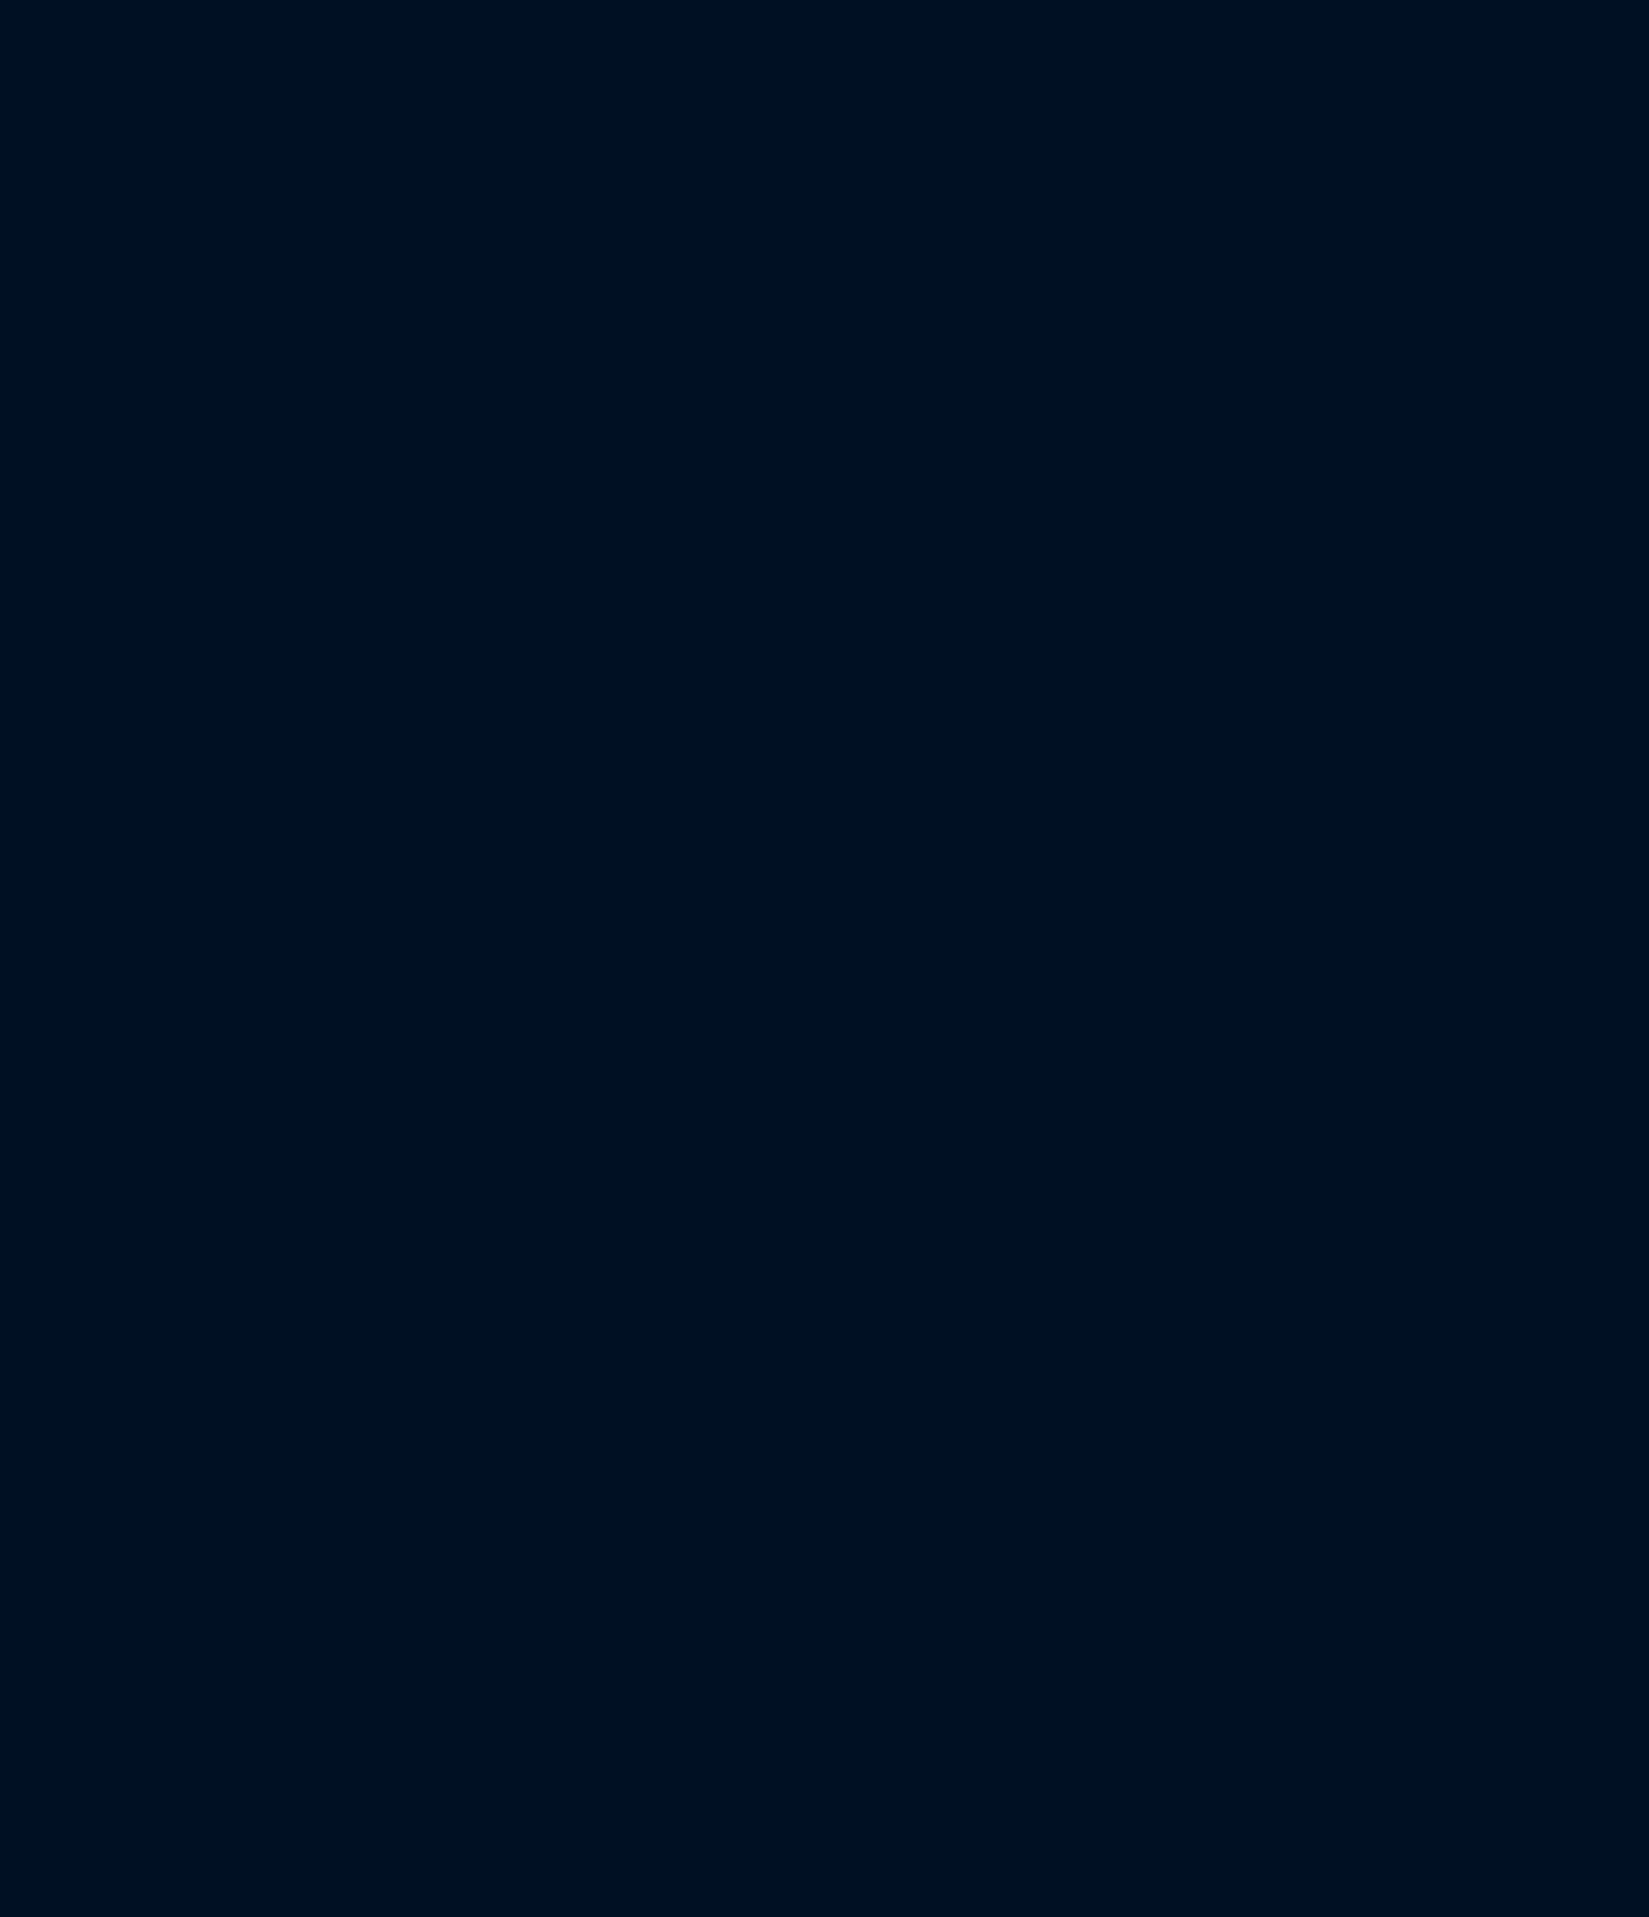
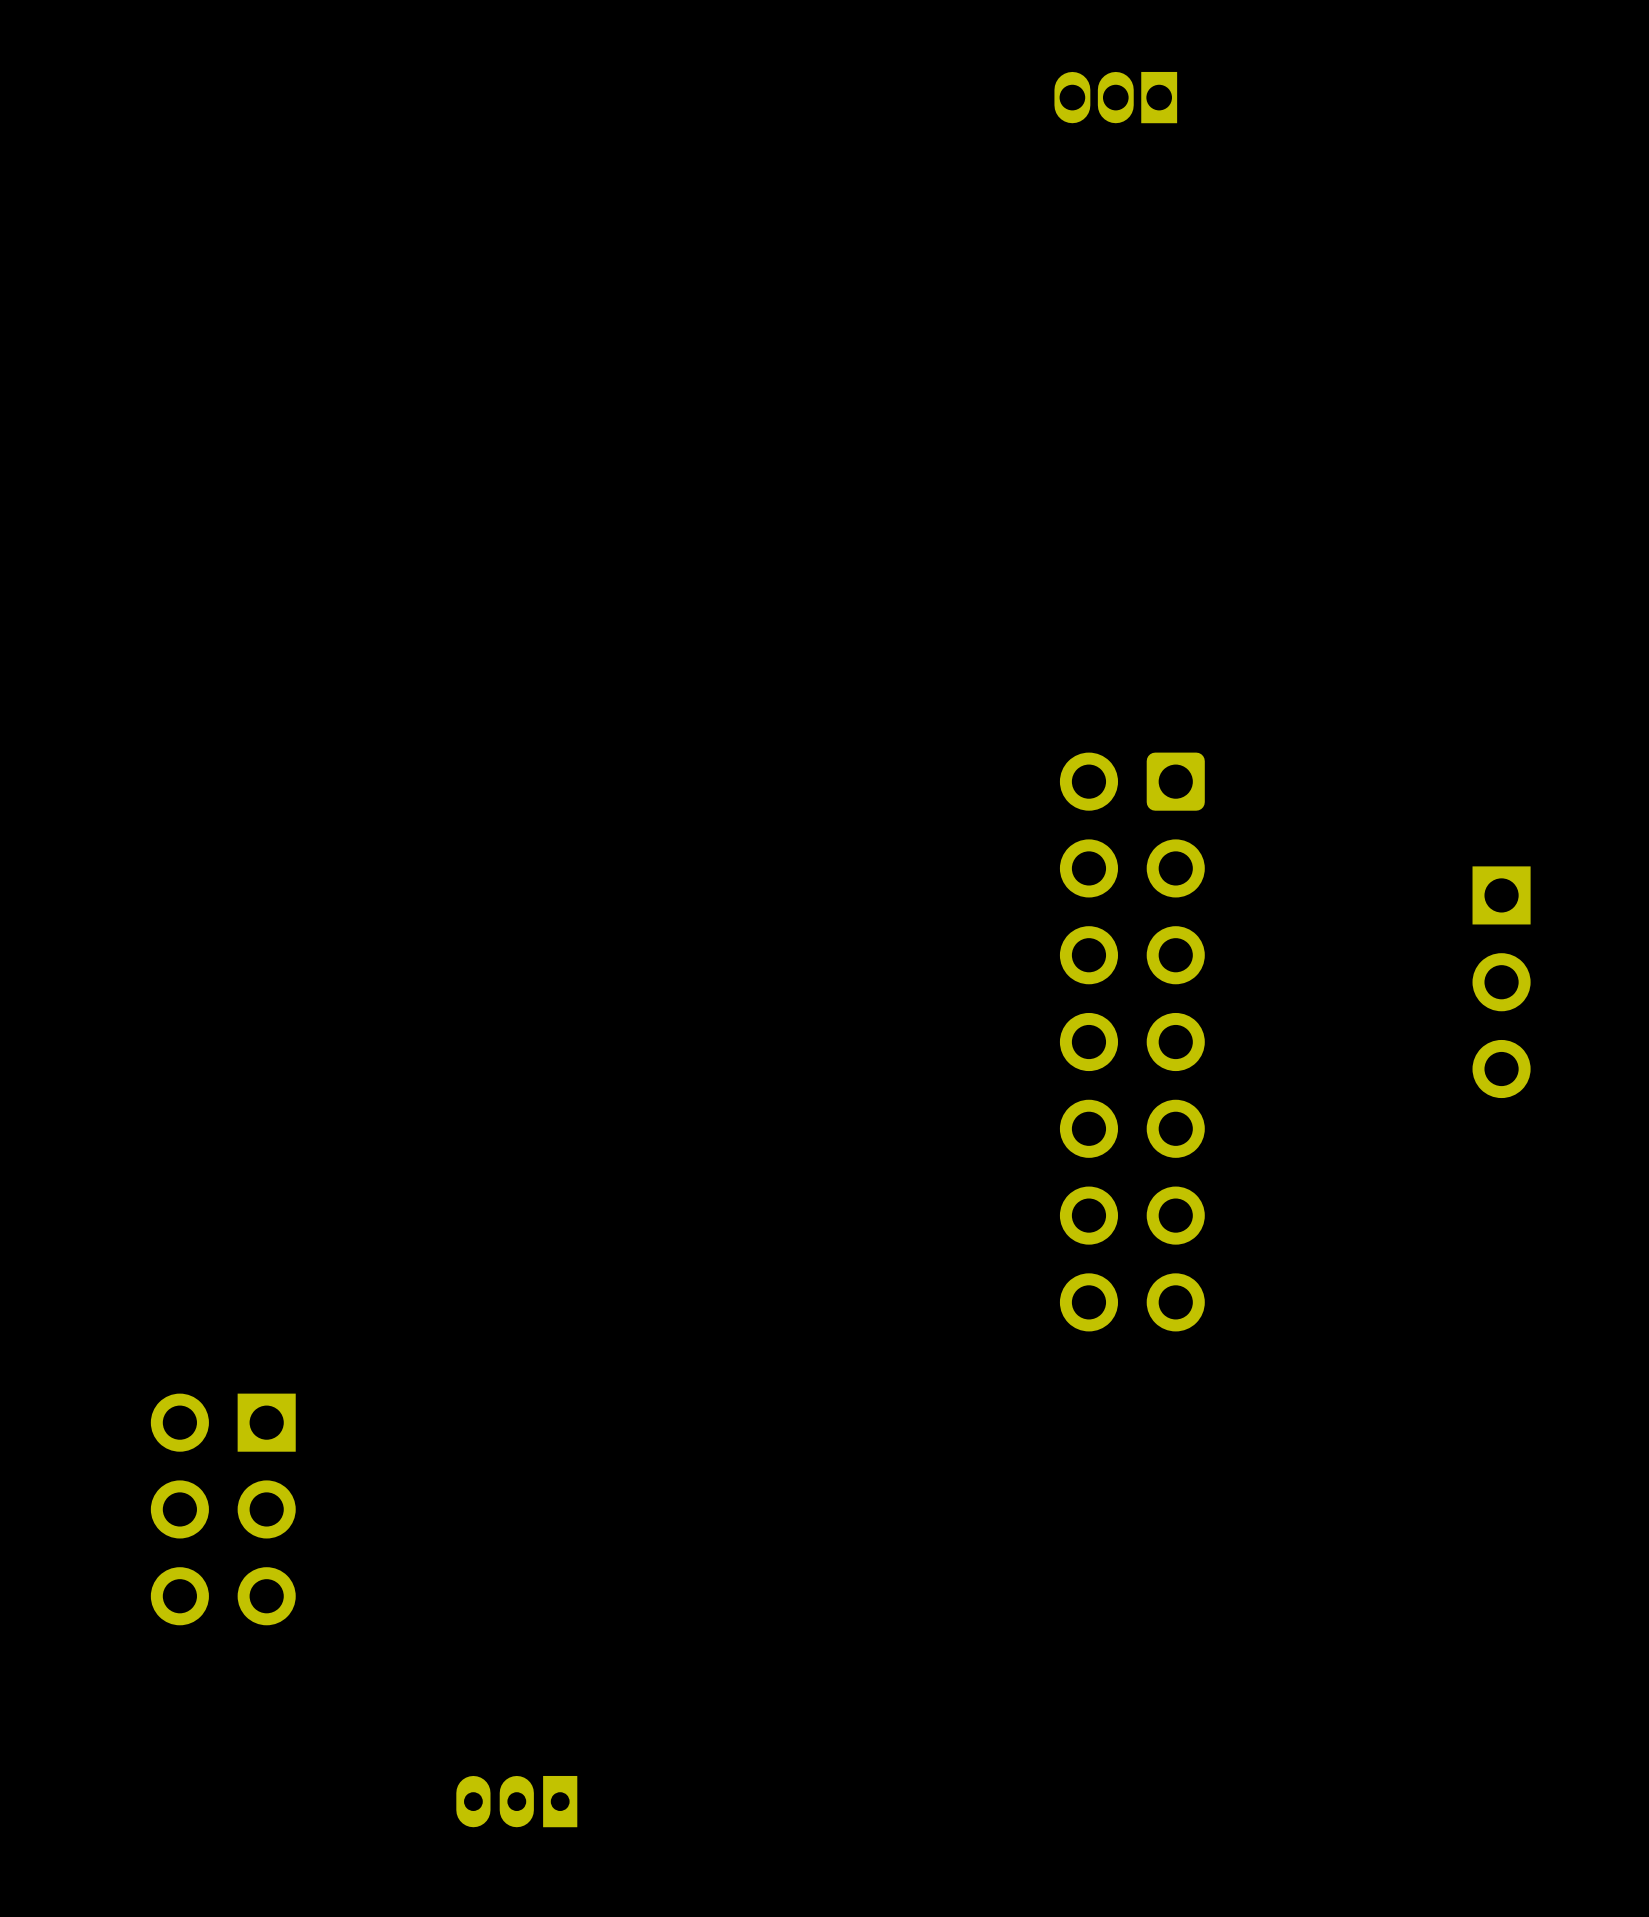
part: none -> (1115, 97)
part: none -> (1501, 982)
part: none -> (1132, 1042)
part: none -> (223, 1509)
part: none -> (516, 1801)

